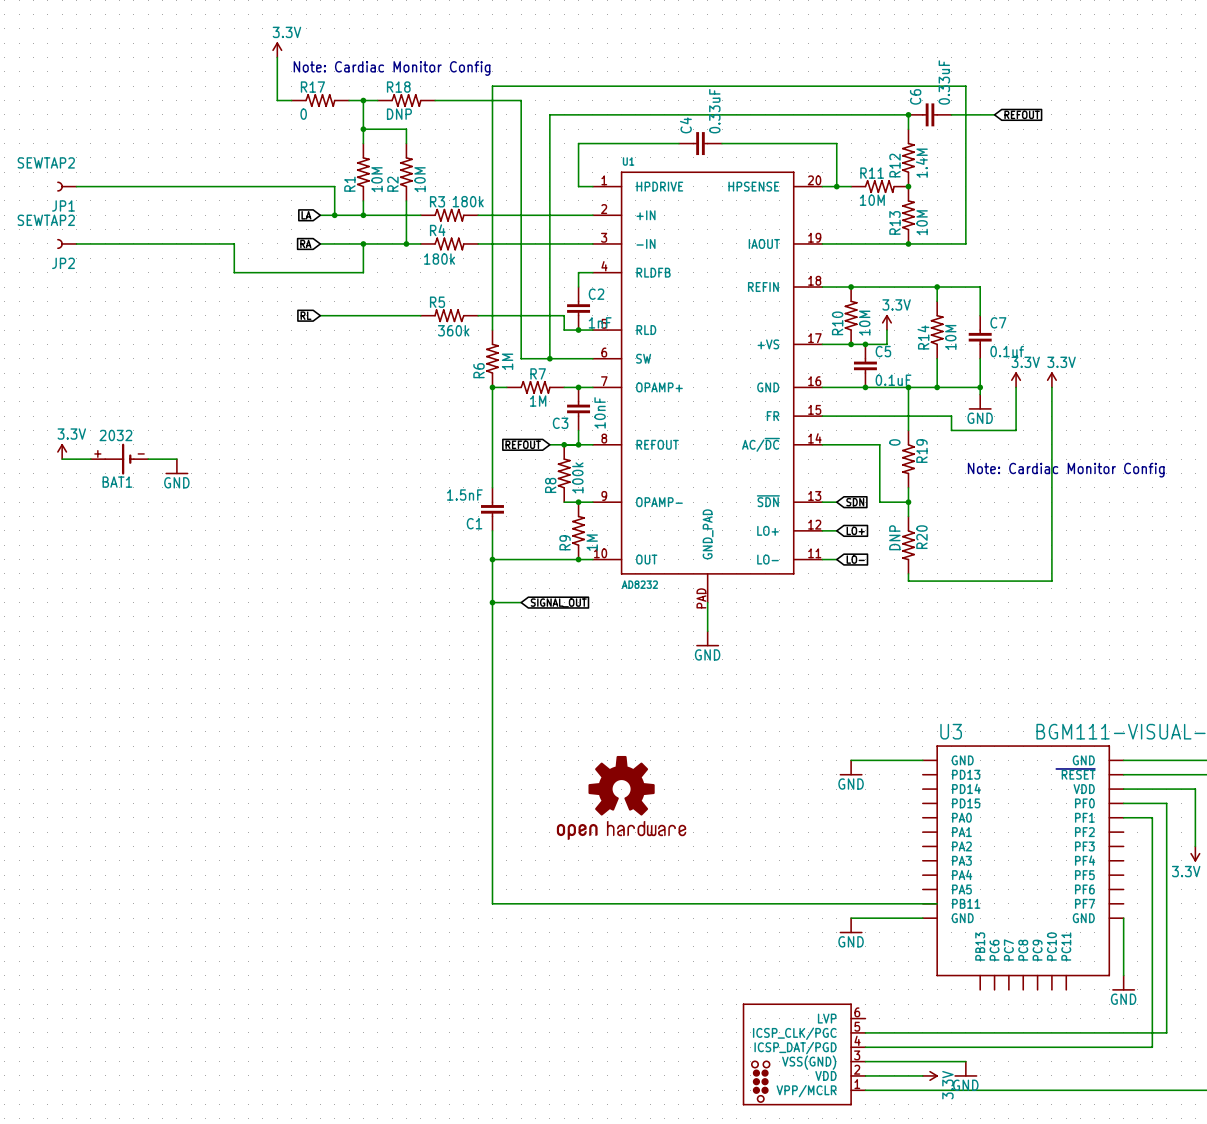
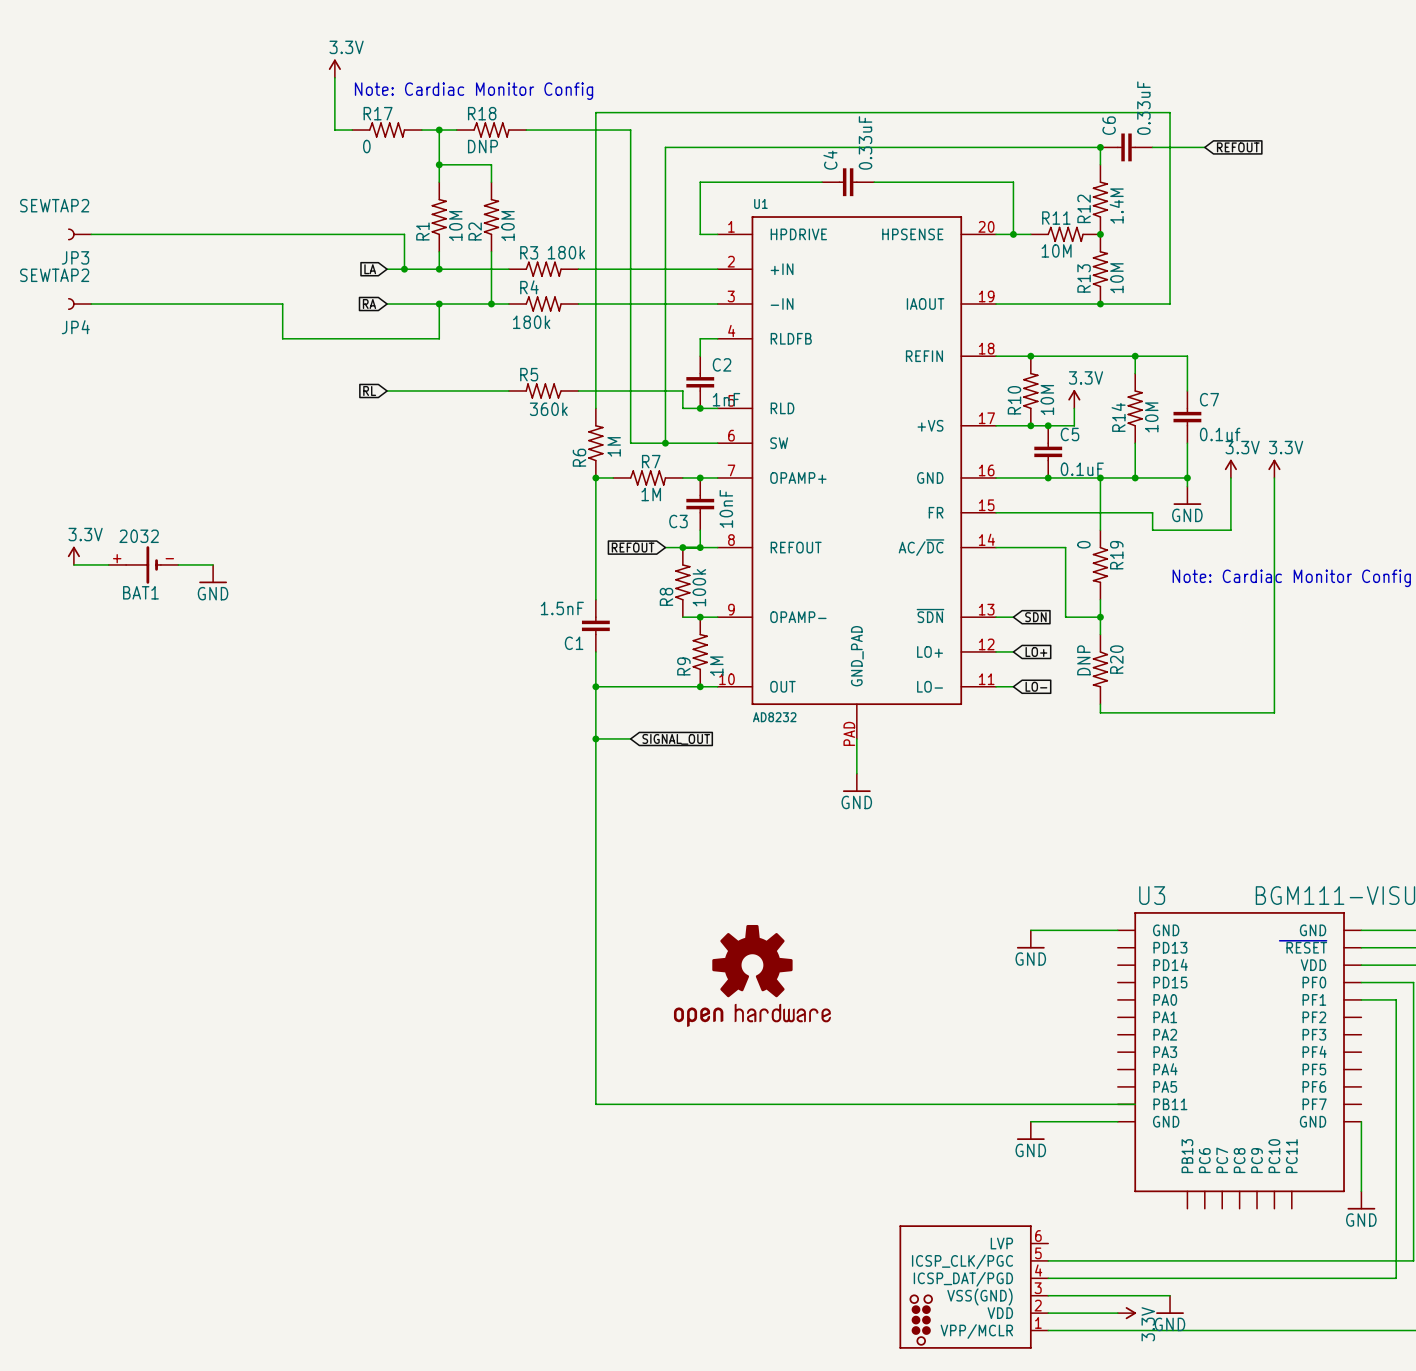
JP1 name: JP1 (63, 205) -> JP3 (75, 257)
JP2 name: JP2 (63, 263) -> JP4 (75, 327)

